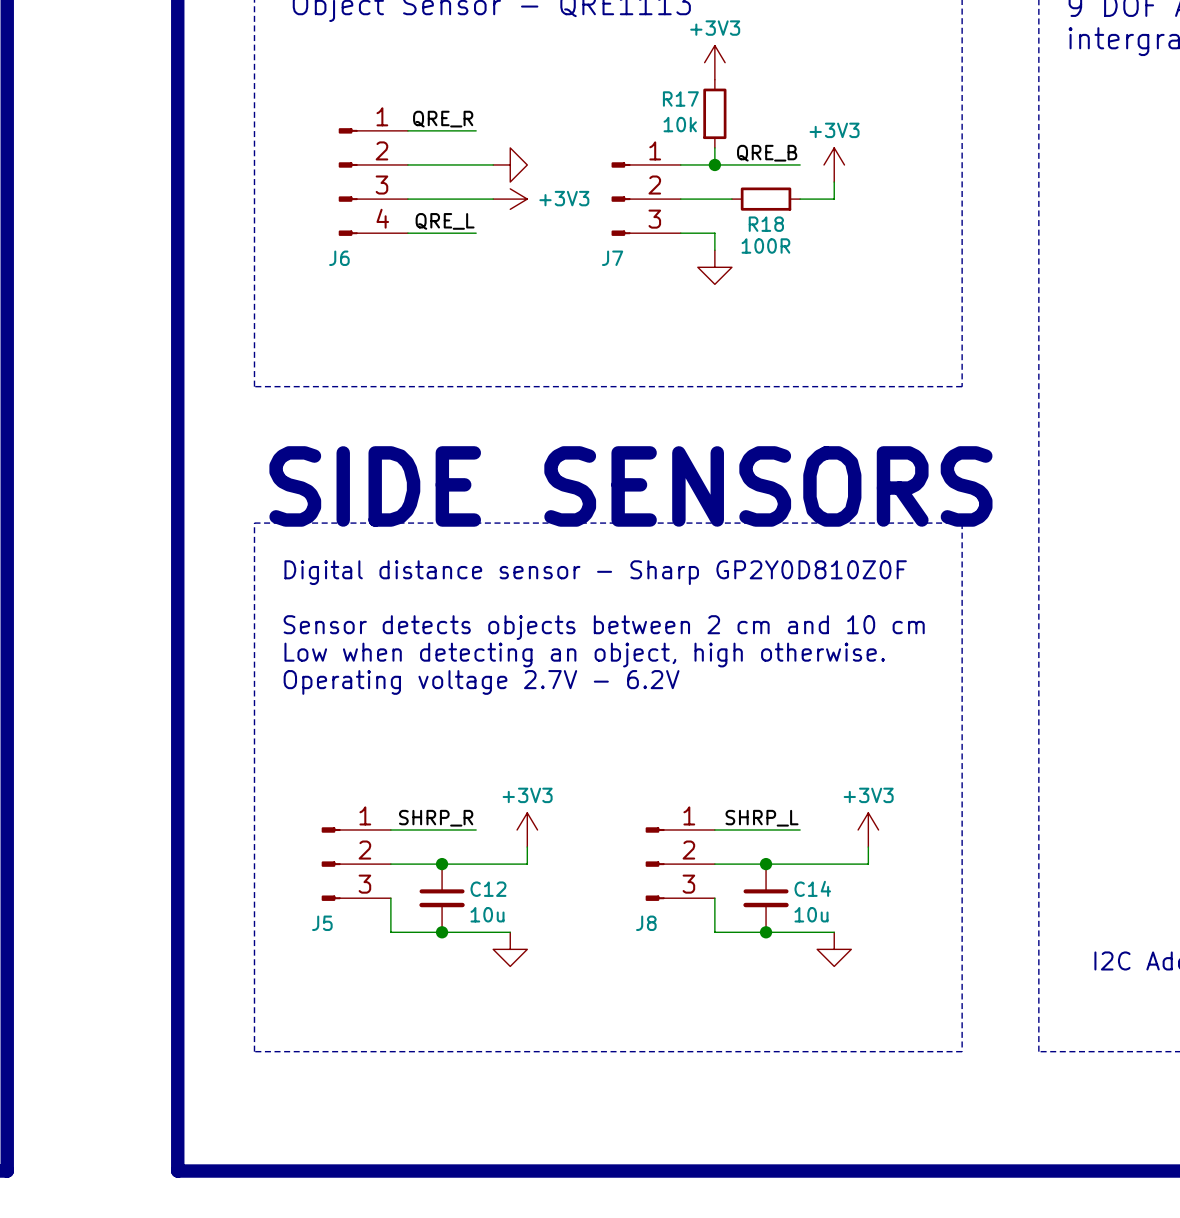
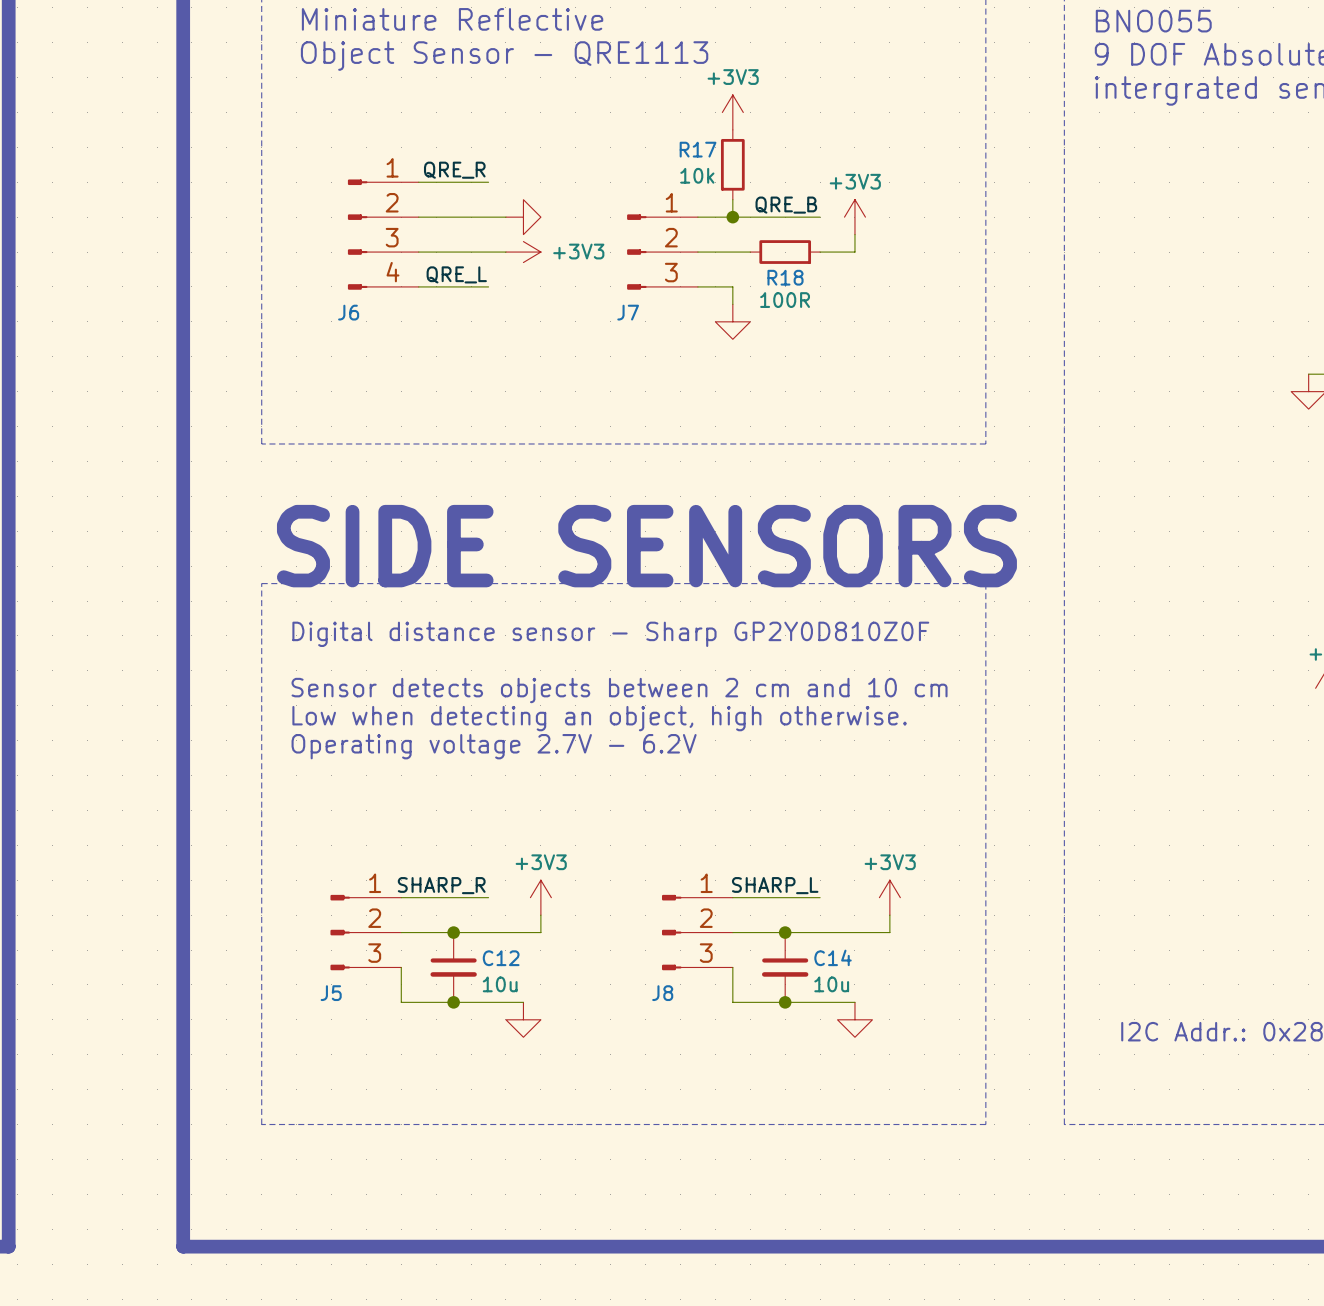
label: SHRP_R (436, 818) -> SHARP_R (441, 885)
label: SHRP_L (762, 818) -> SHARP_L (775, 885)

